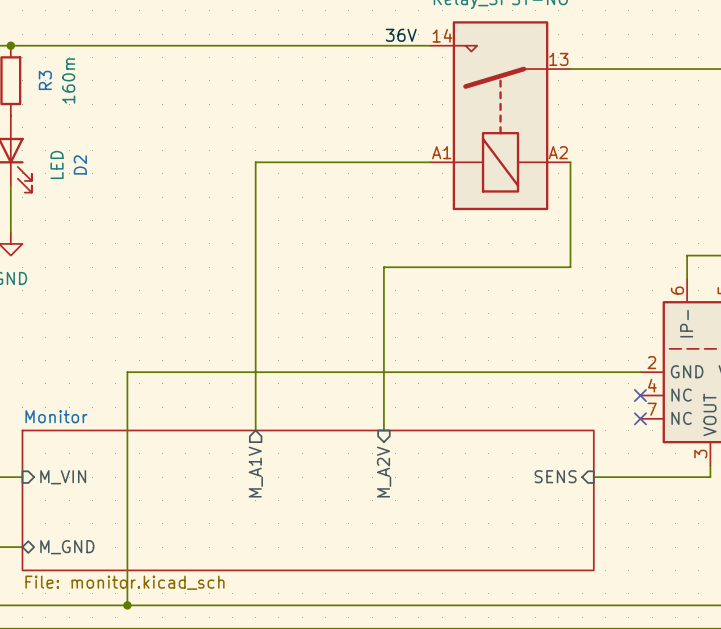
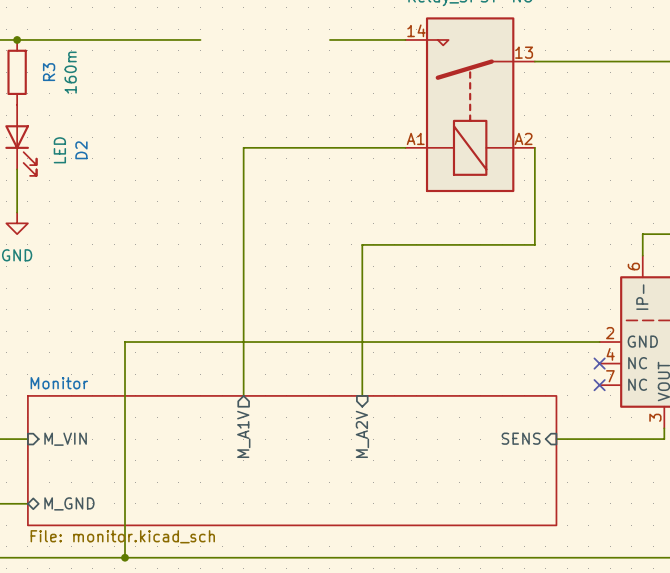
label: 36V (401, 35) -> none
wire: (209, 45) (348, 45) -> none

